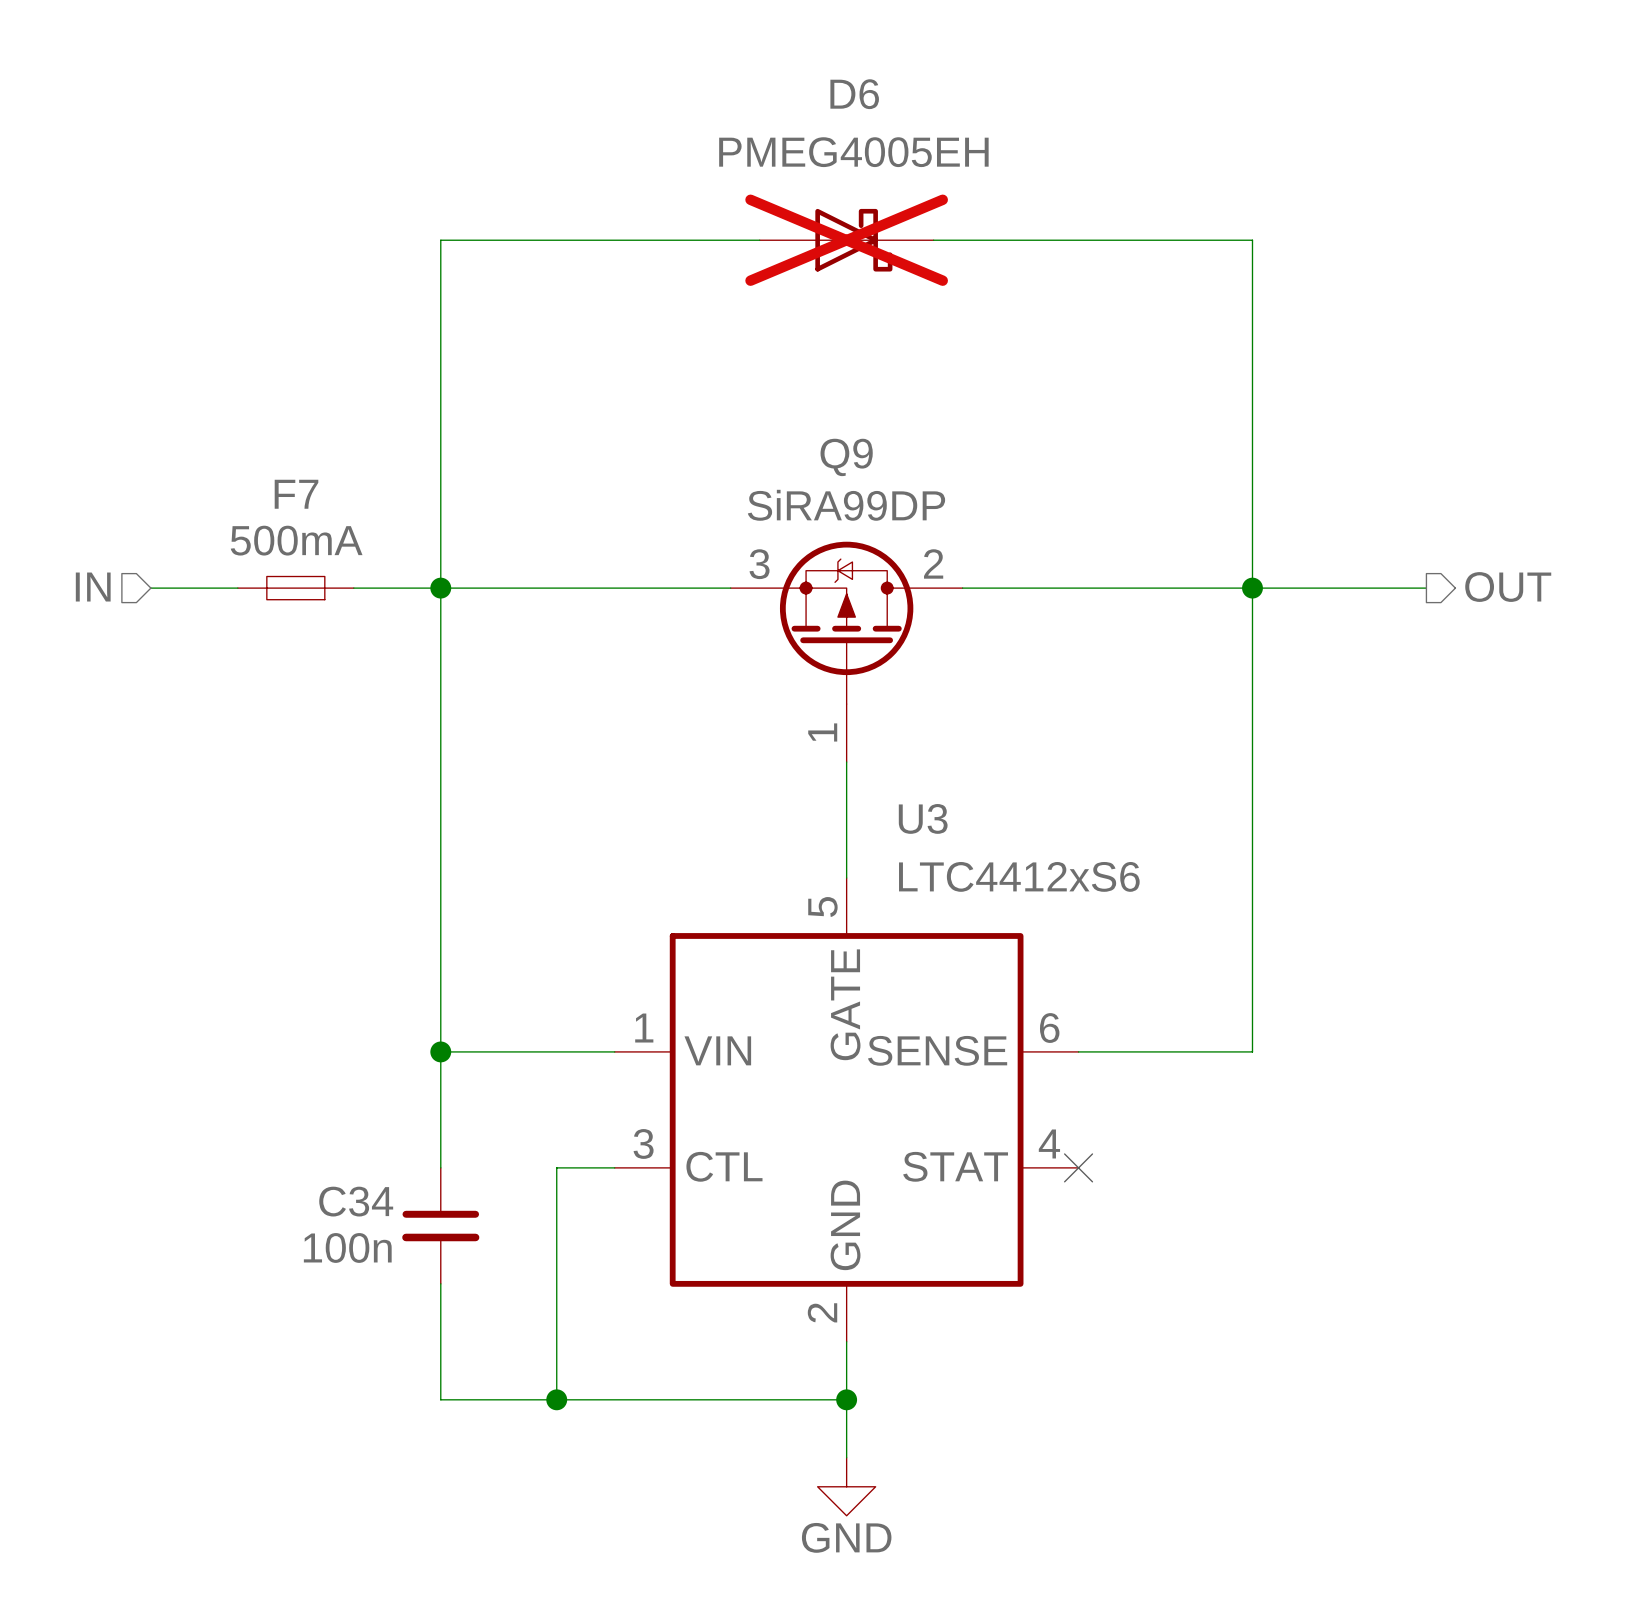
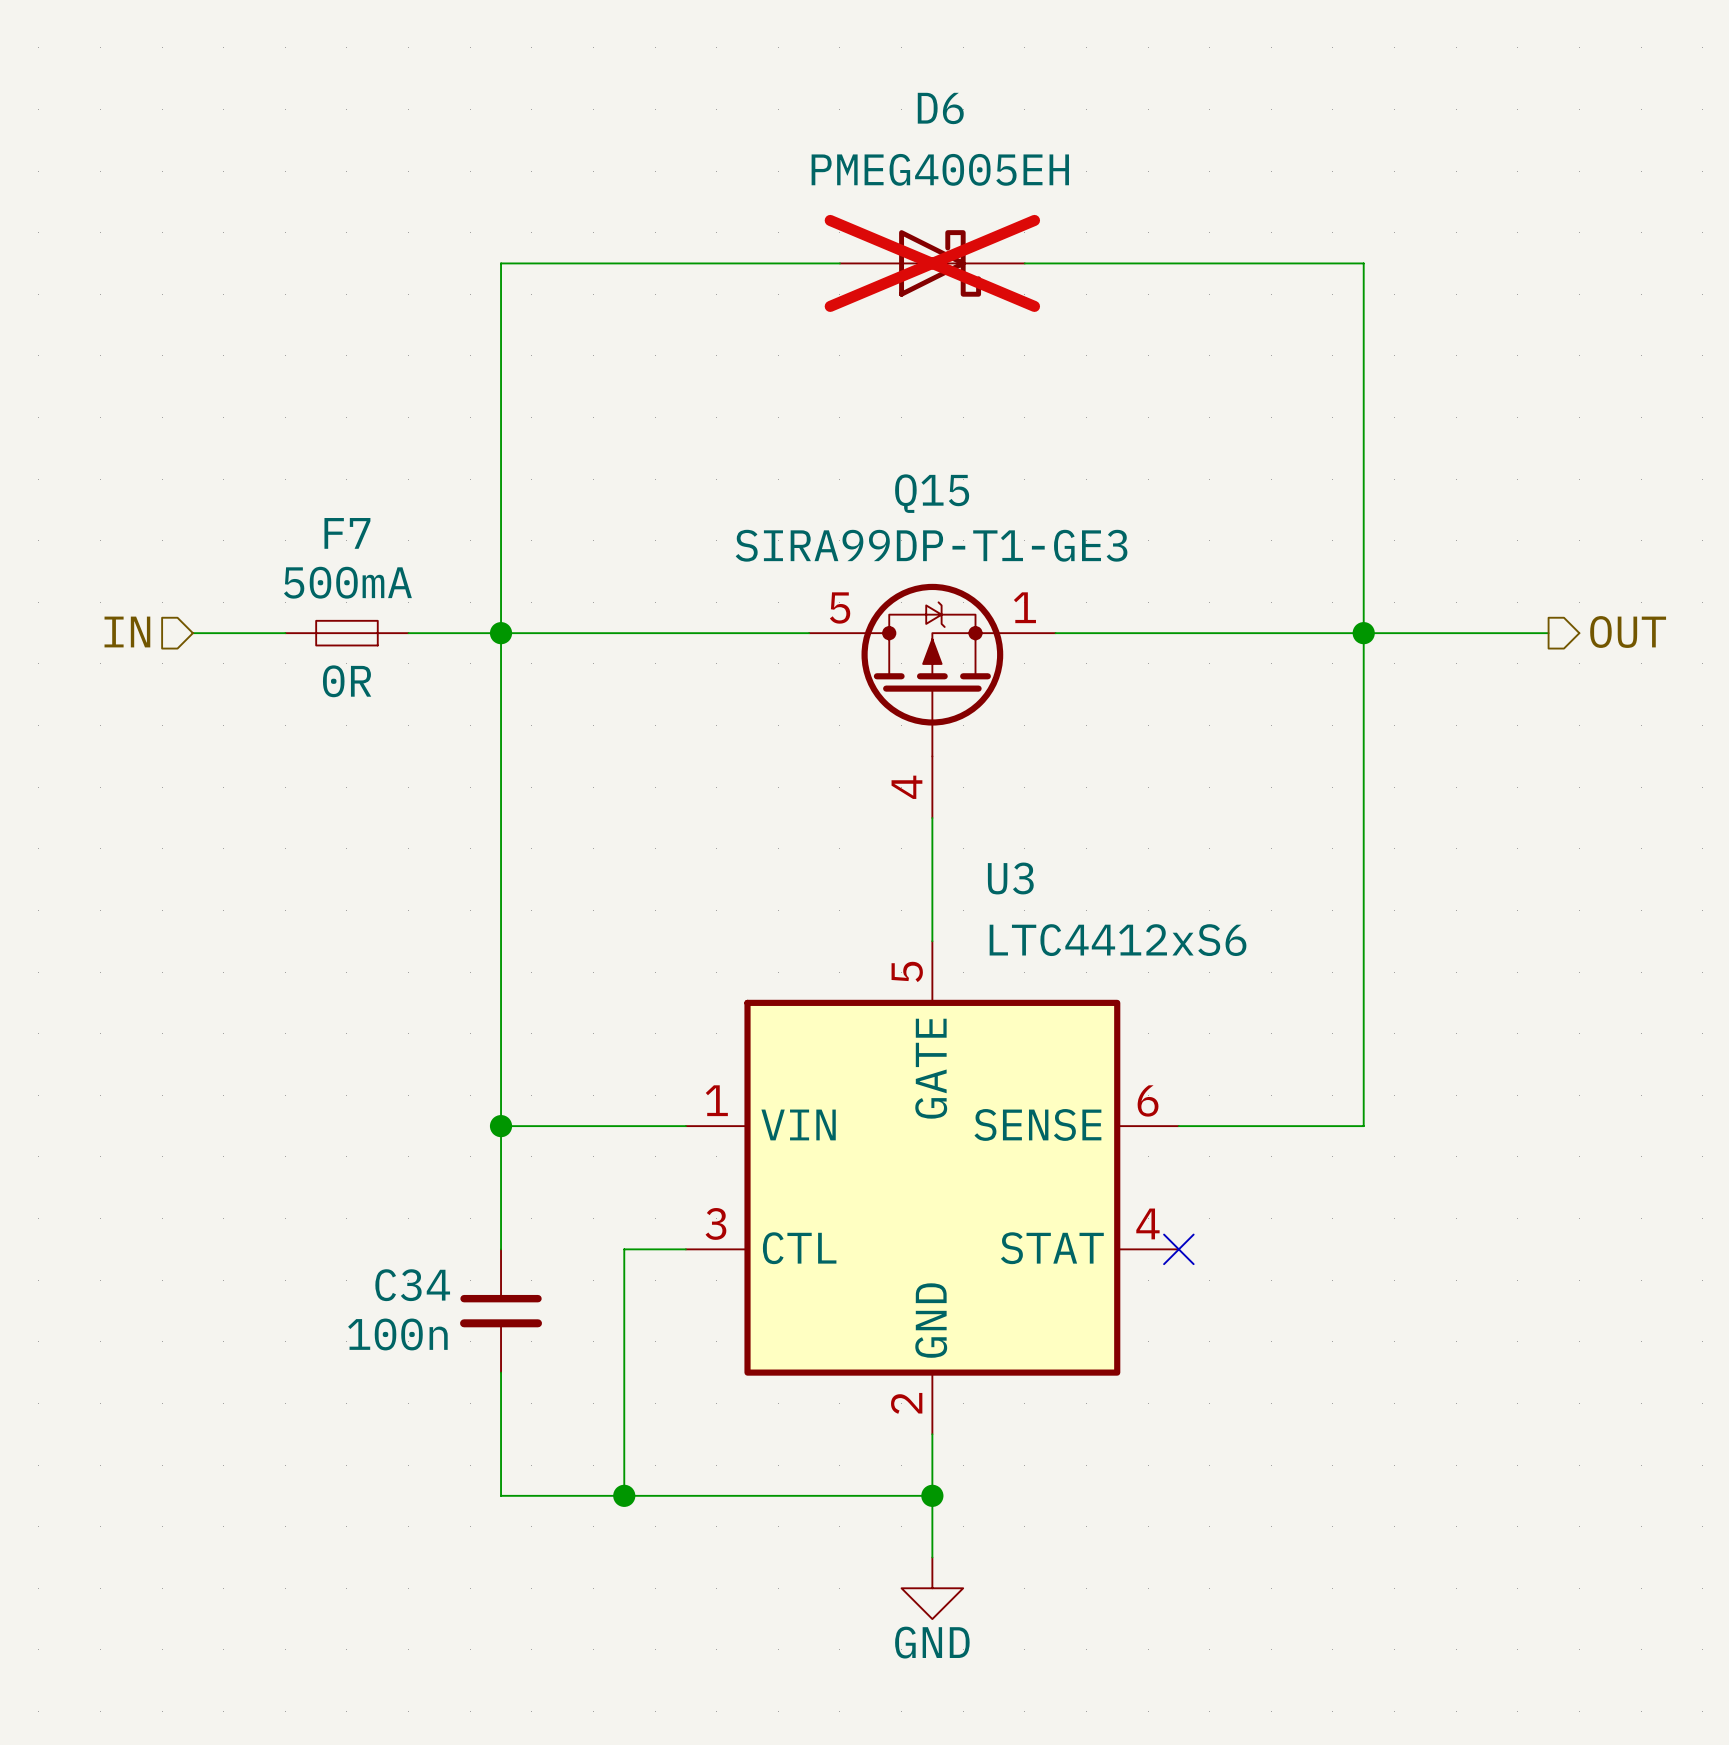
F7 text: none -> 0R (347, 681)
Q9: SiRA99DP (846, 651) -> none
Q15: none -> SIRA99DP-T1-GE3 (932, 700)

